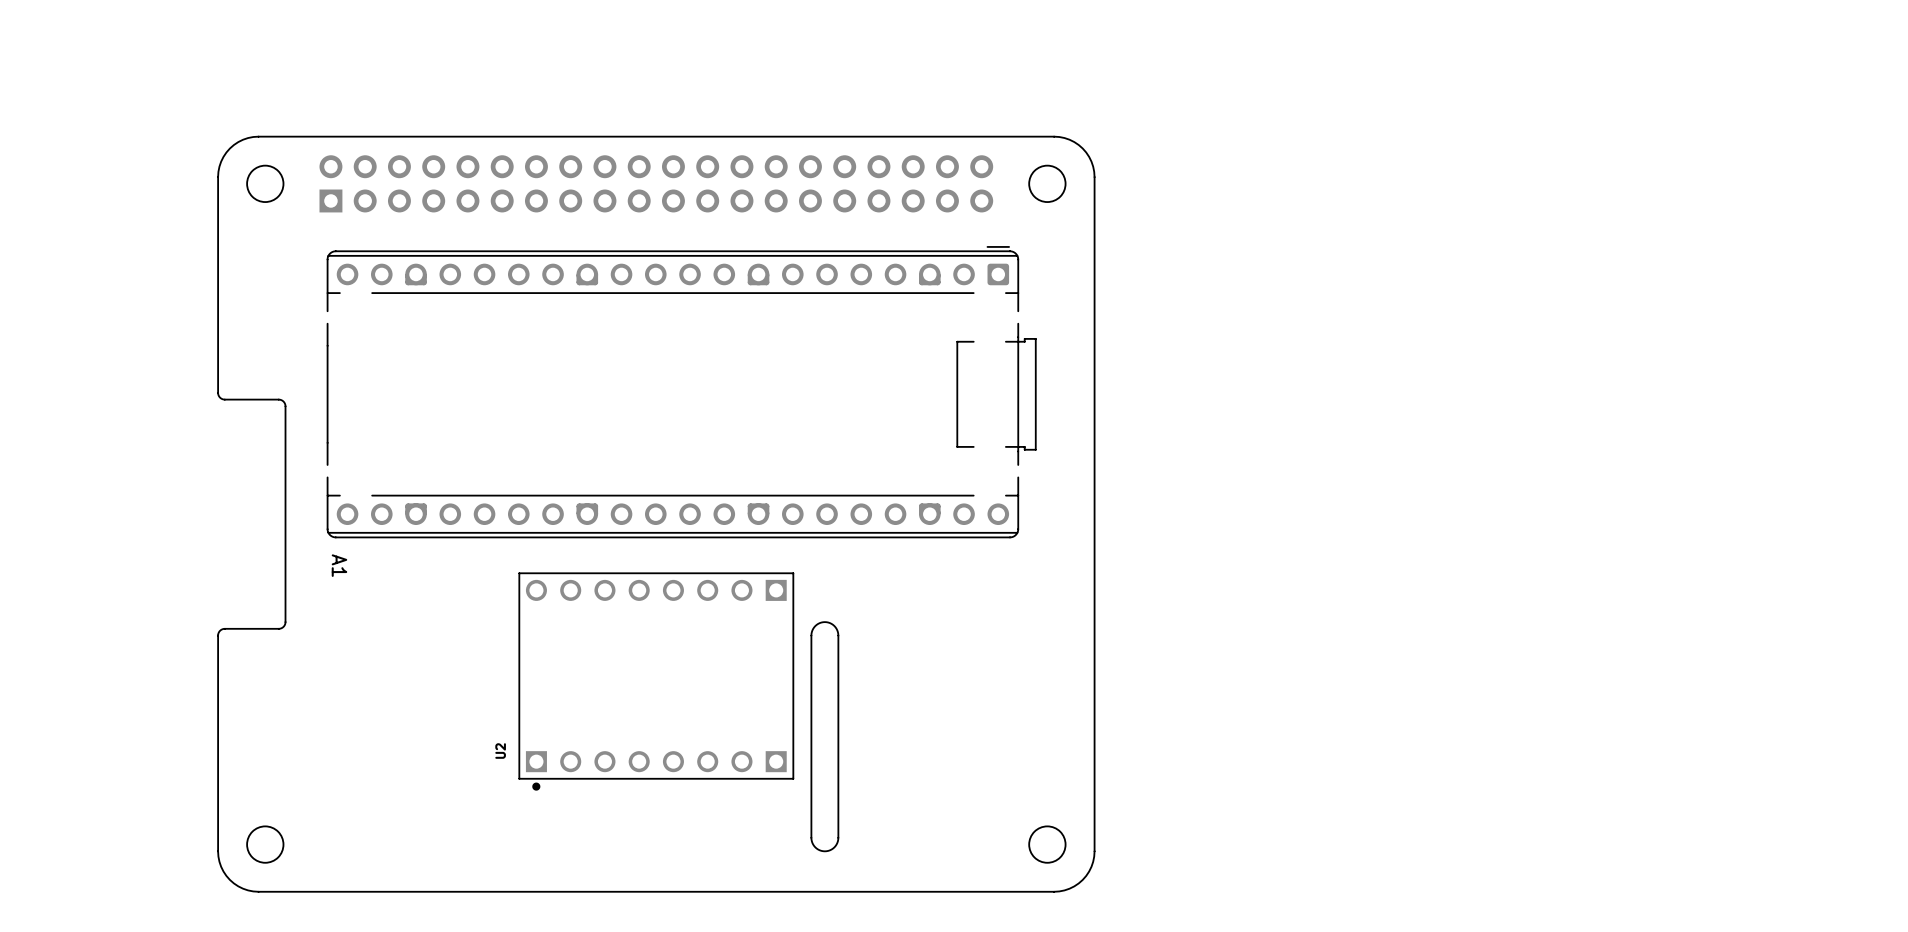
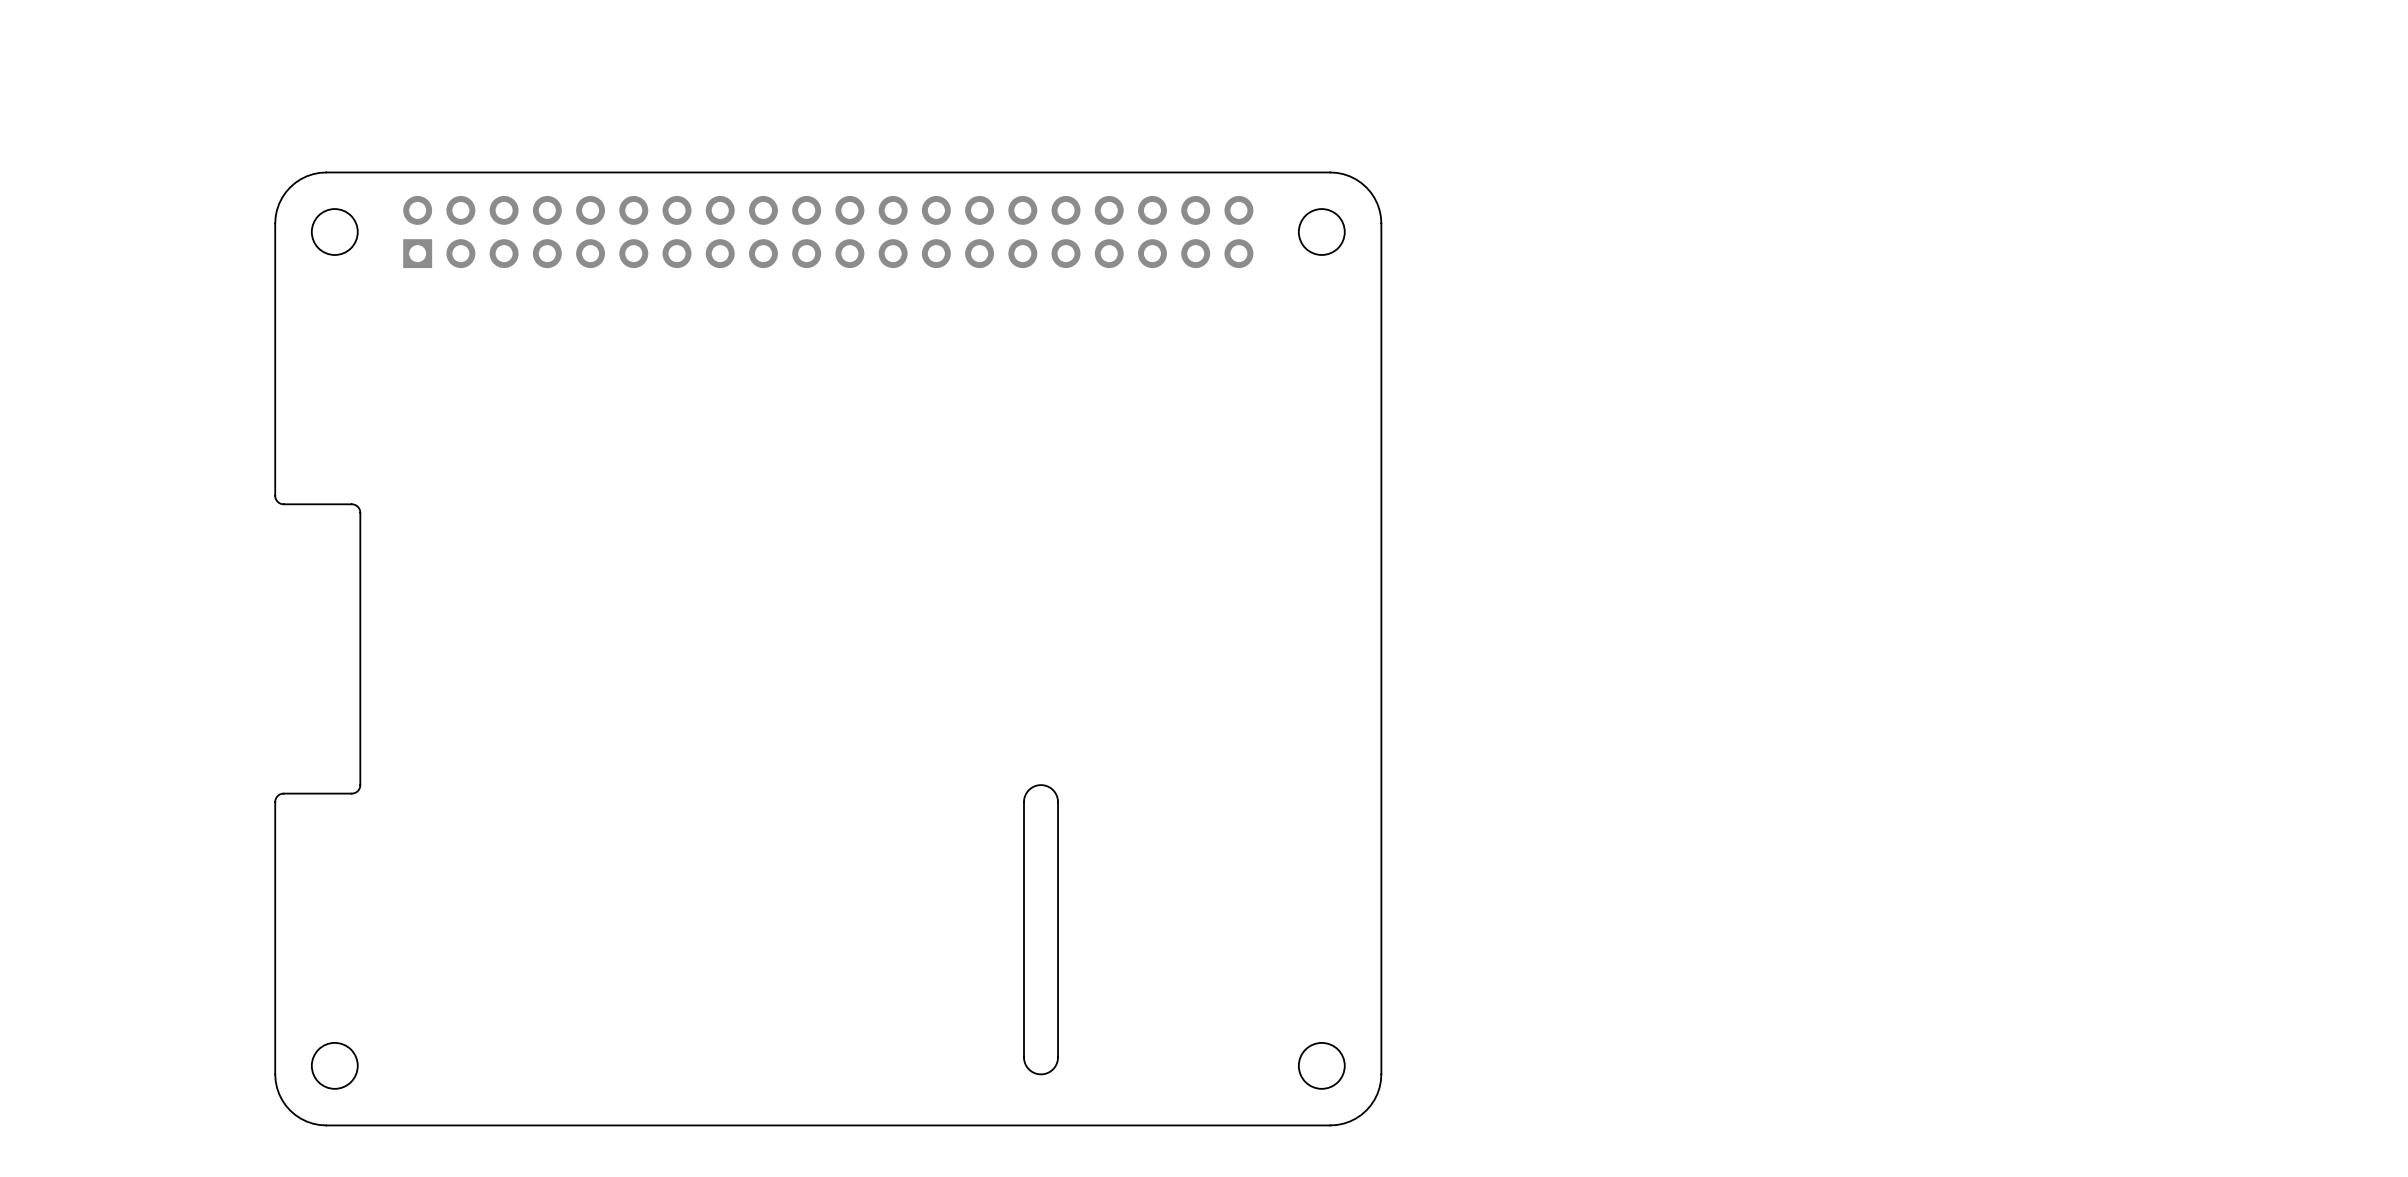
A1: (681, 392) -> none
U2: (656, 681) -> none

